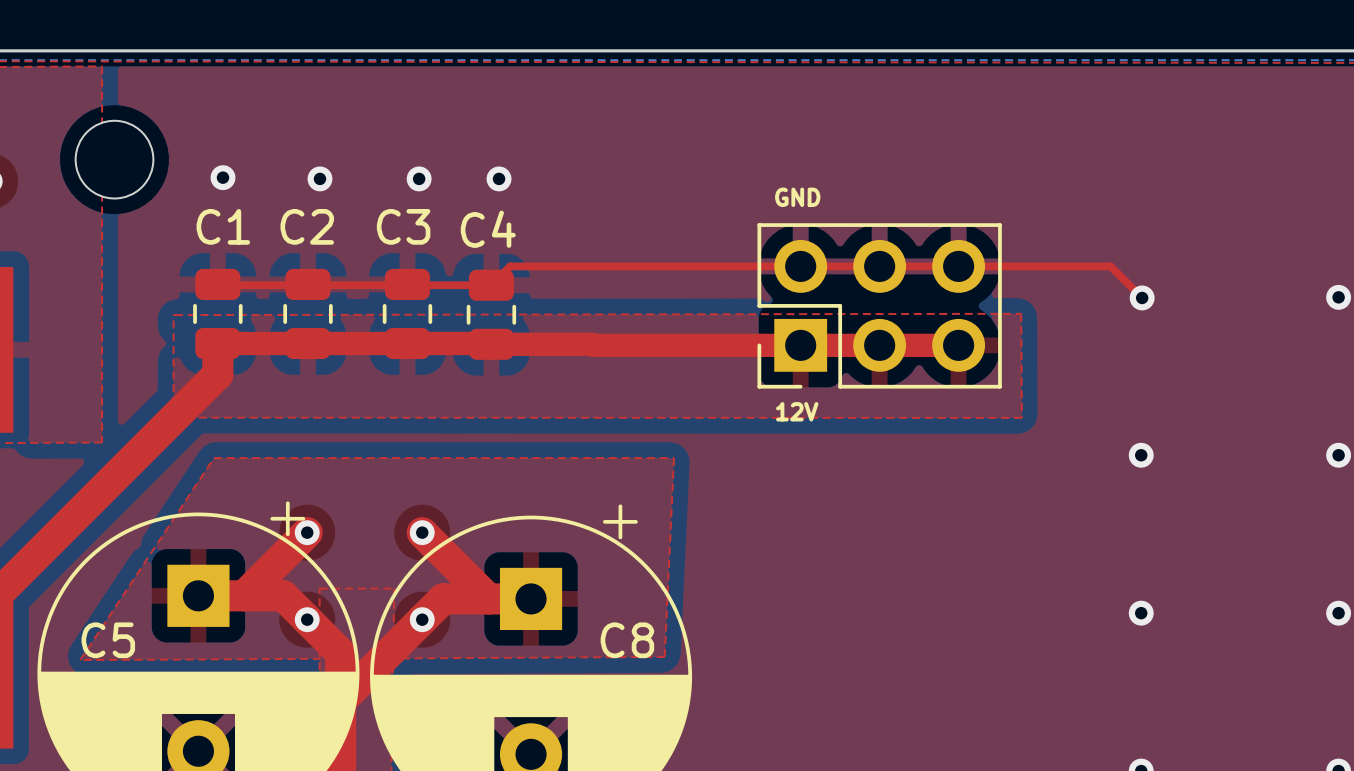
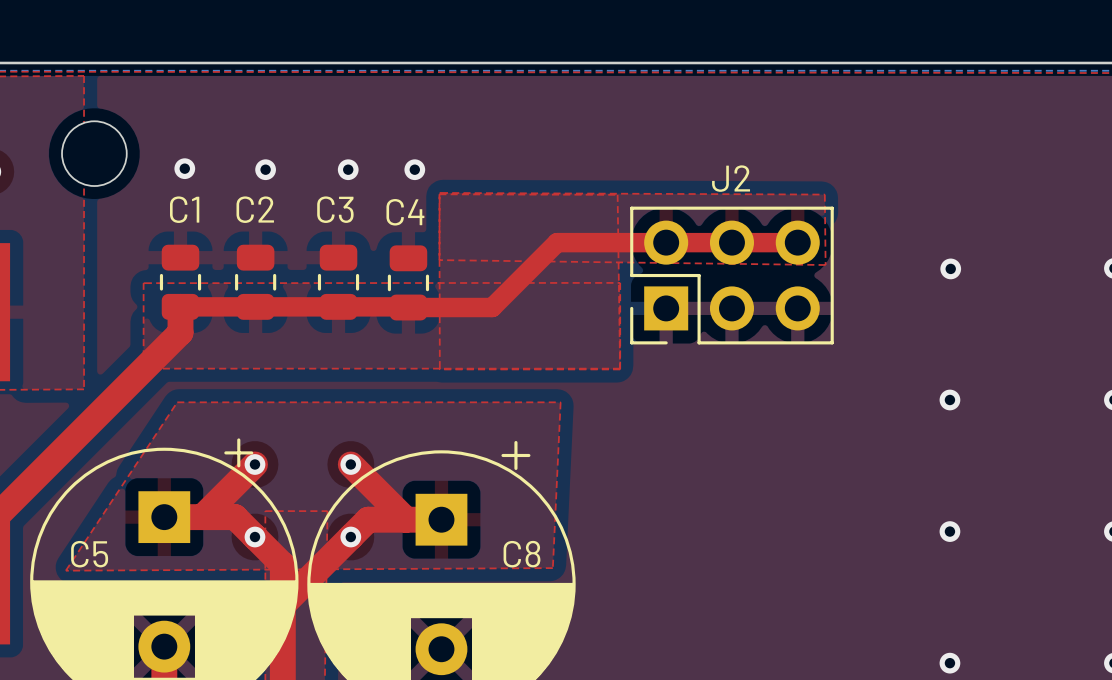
J2 name: none -> J2 (731, 178)
text: GND (797, 197) -> none
top zone outline: none -> (439, 192) (439, 260) (825, 265) (824, 194) (439, 192)
top zone outline: none -> (439, 194) (439, 369) (620, 369) (617, 194) (439, 194)
top track: (669, 266) (510, 266) (491, 285) (217, 284) -> none
top track width: thin (669, 266) (958, 266) -> thick (557, 242) (797, 242)
top track: (958, 266) (1110, 266) (1142, 297) -> none
top zone outline: (175, 315) (1021, 313) (1021, 417) (173, 417) -> (144, 283) (620, 282) (620, 368) (143, 368)
top track: (591, 344) (958, 345) -> (492, 307) (557, 242)
text: 12V (797, 411) -> none

